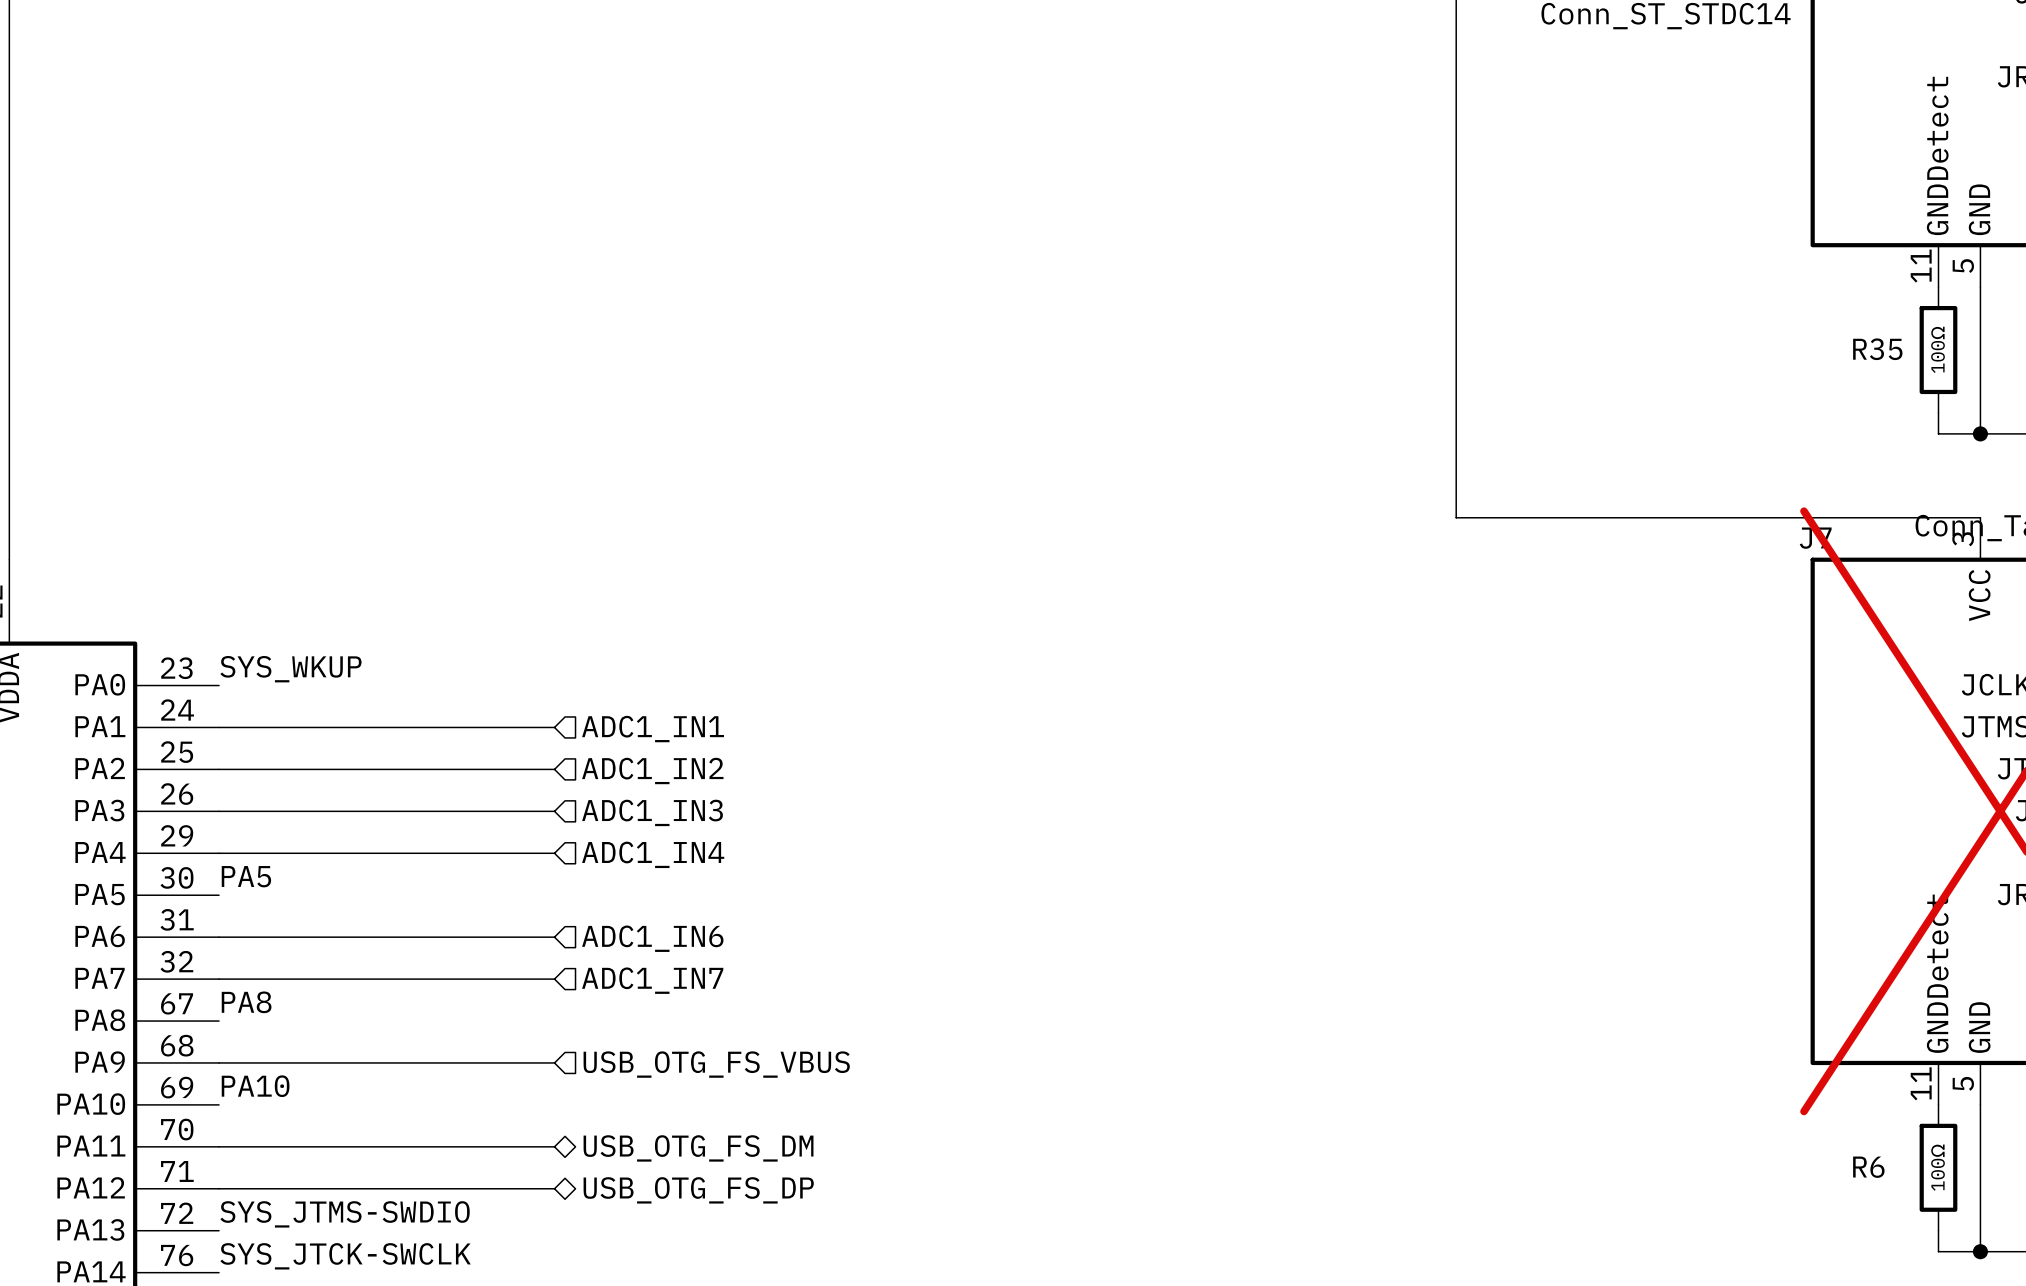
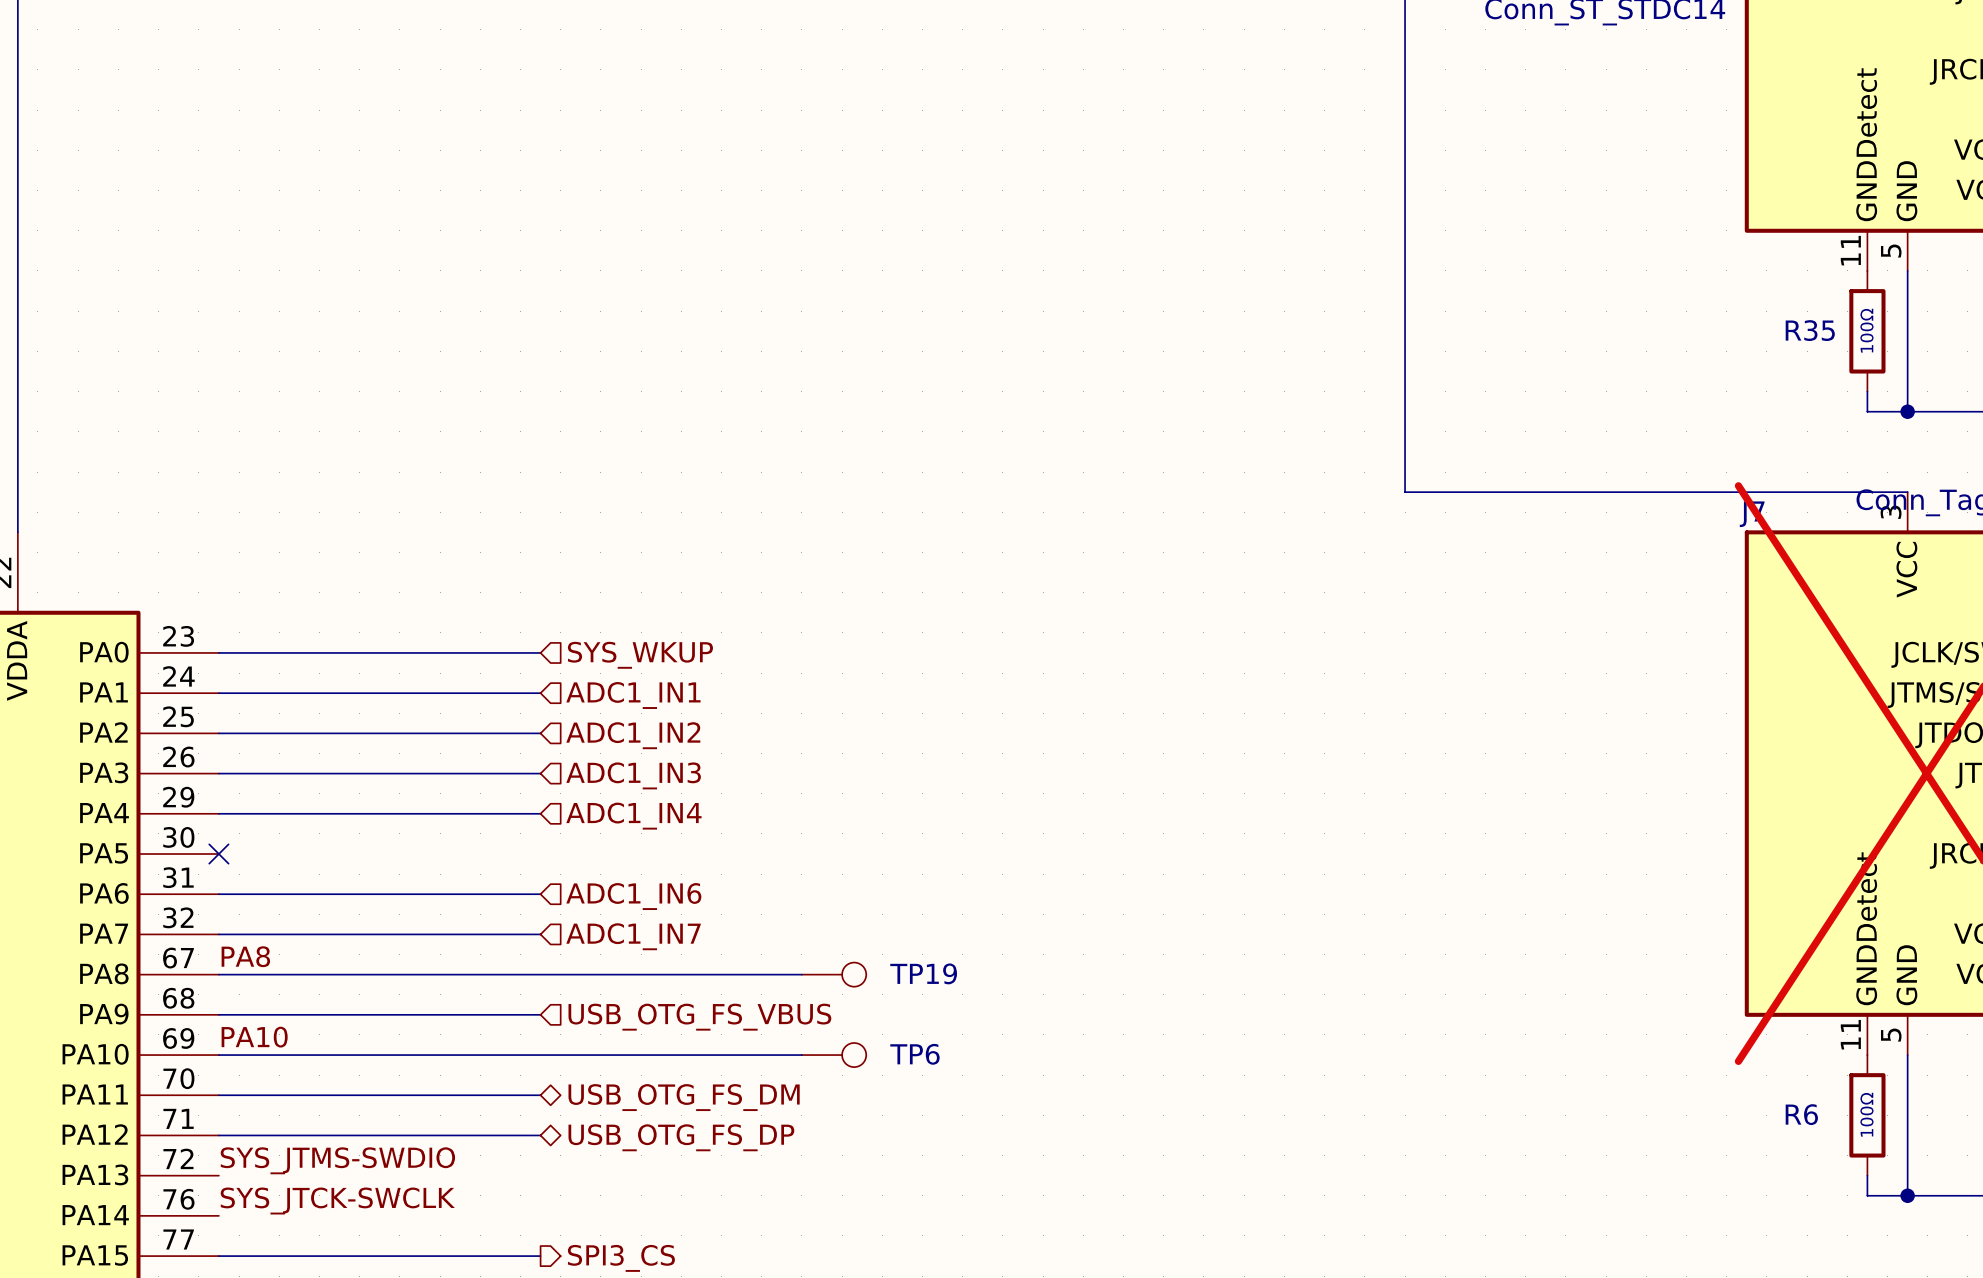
label: SYS_WKUP (290, 669) -> none
wire: none -> (218, 652) (540, 652)
hierarchical label: none -> SYS_WKUP (640, 655)
label: PA5 (246, 876) -> none
no-connect mark: none -> (218, 854)
wire: none -> (218, 974) (801, 974)
TP19: none -> (834, 974)
wire: none -> (218, 1055) (801, 1055)
TP6: none -> (834, 1055)

